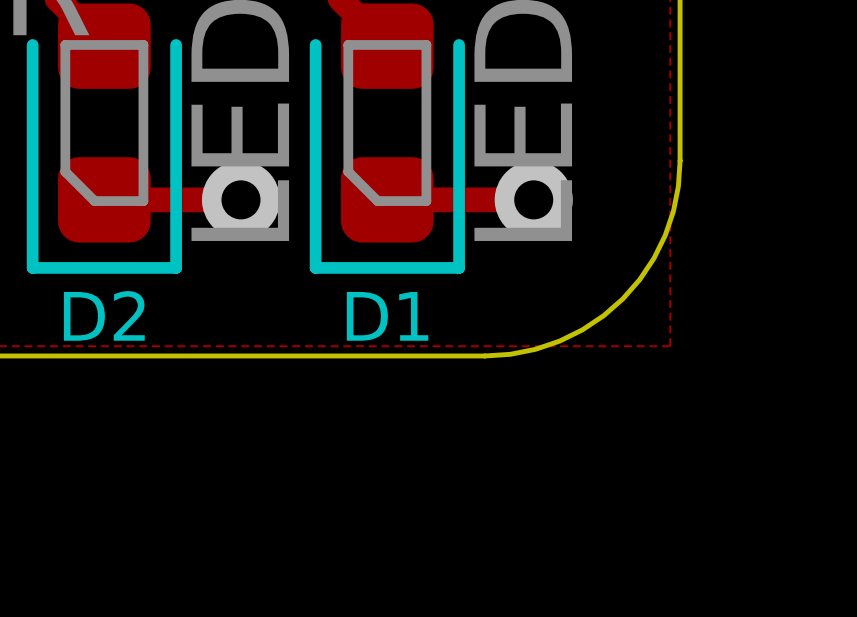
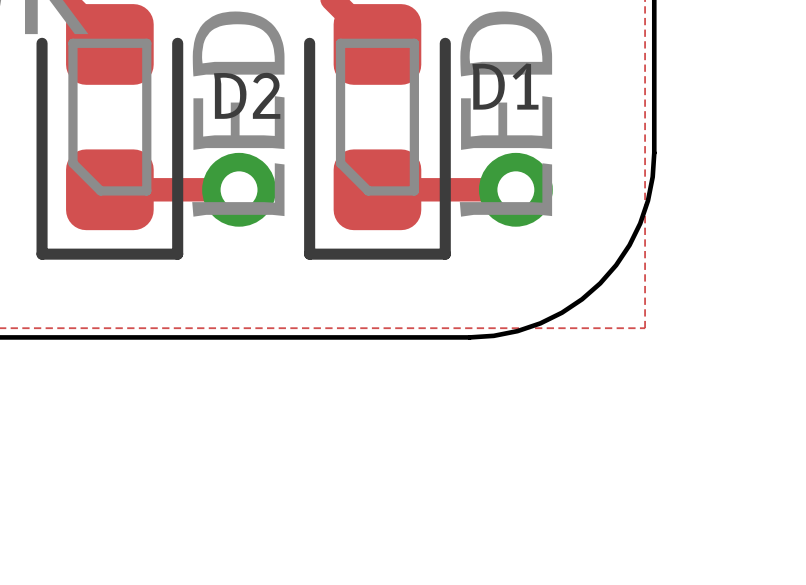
D2 name position: D2 (104, 315) -> D2 (247, 95)
D1 name position: D1 (387, 316) -> D1 (505, 86)

